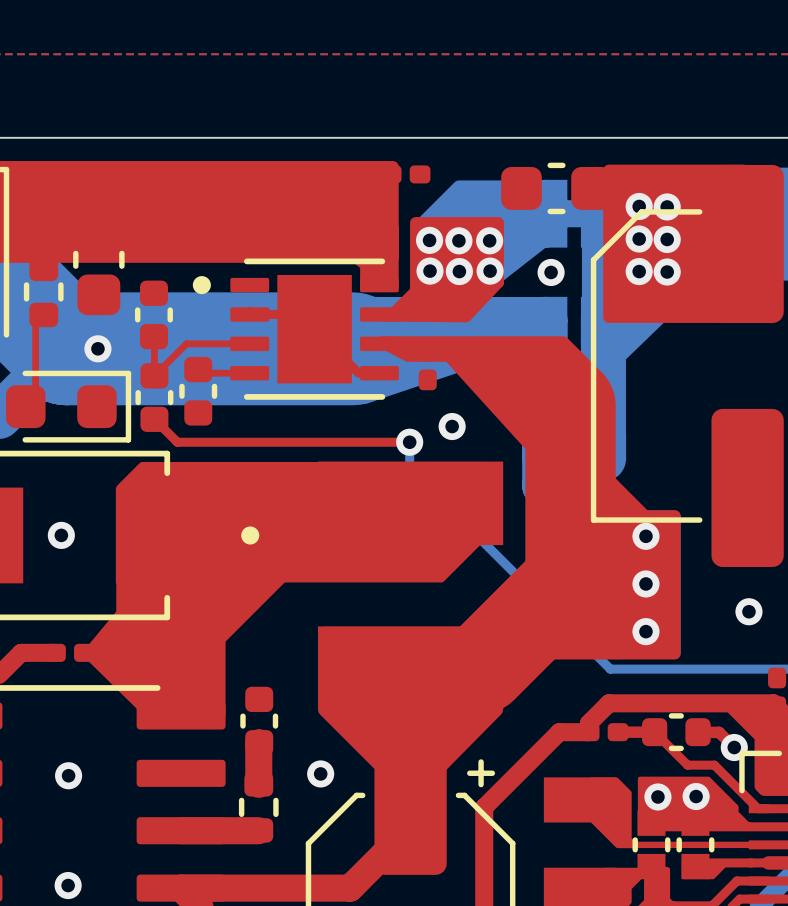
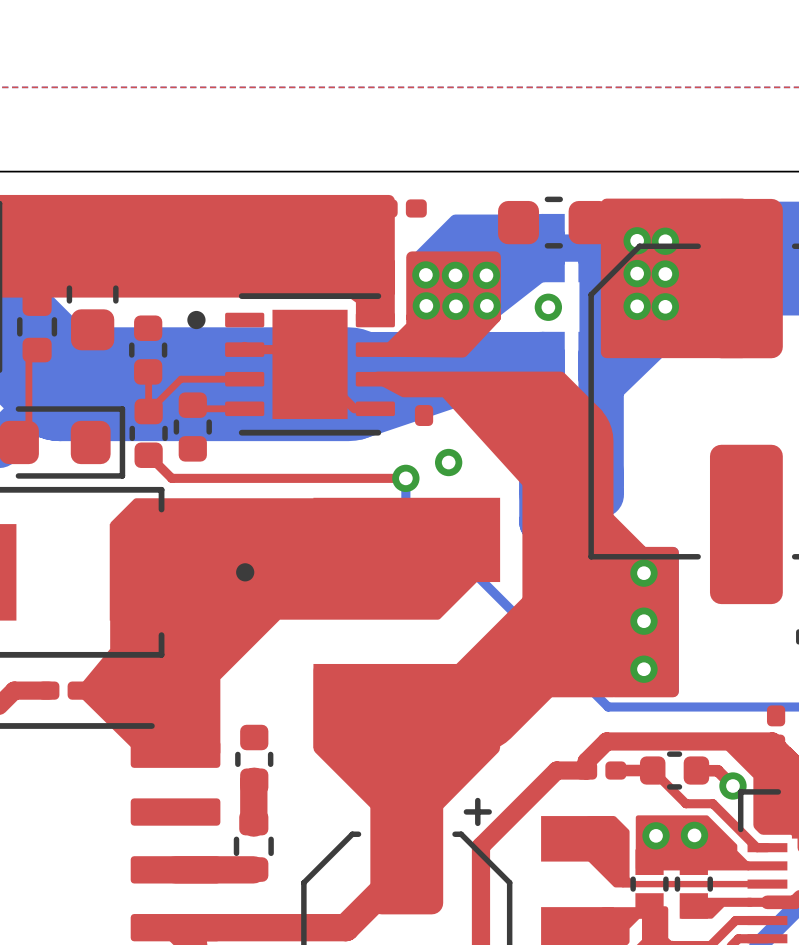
via: (97, 348) -> none
via: (61, 535) -> none
via: (748, 611) -> none
via: (320, 773) -> none
via: (68, 775) -> none
via: (68, 885) -> none

